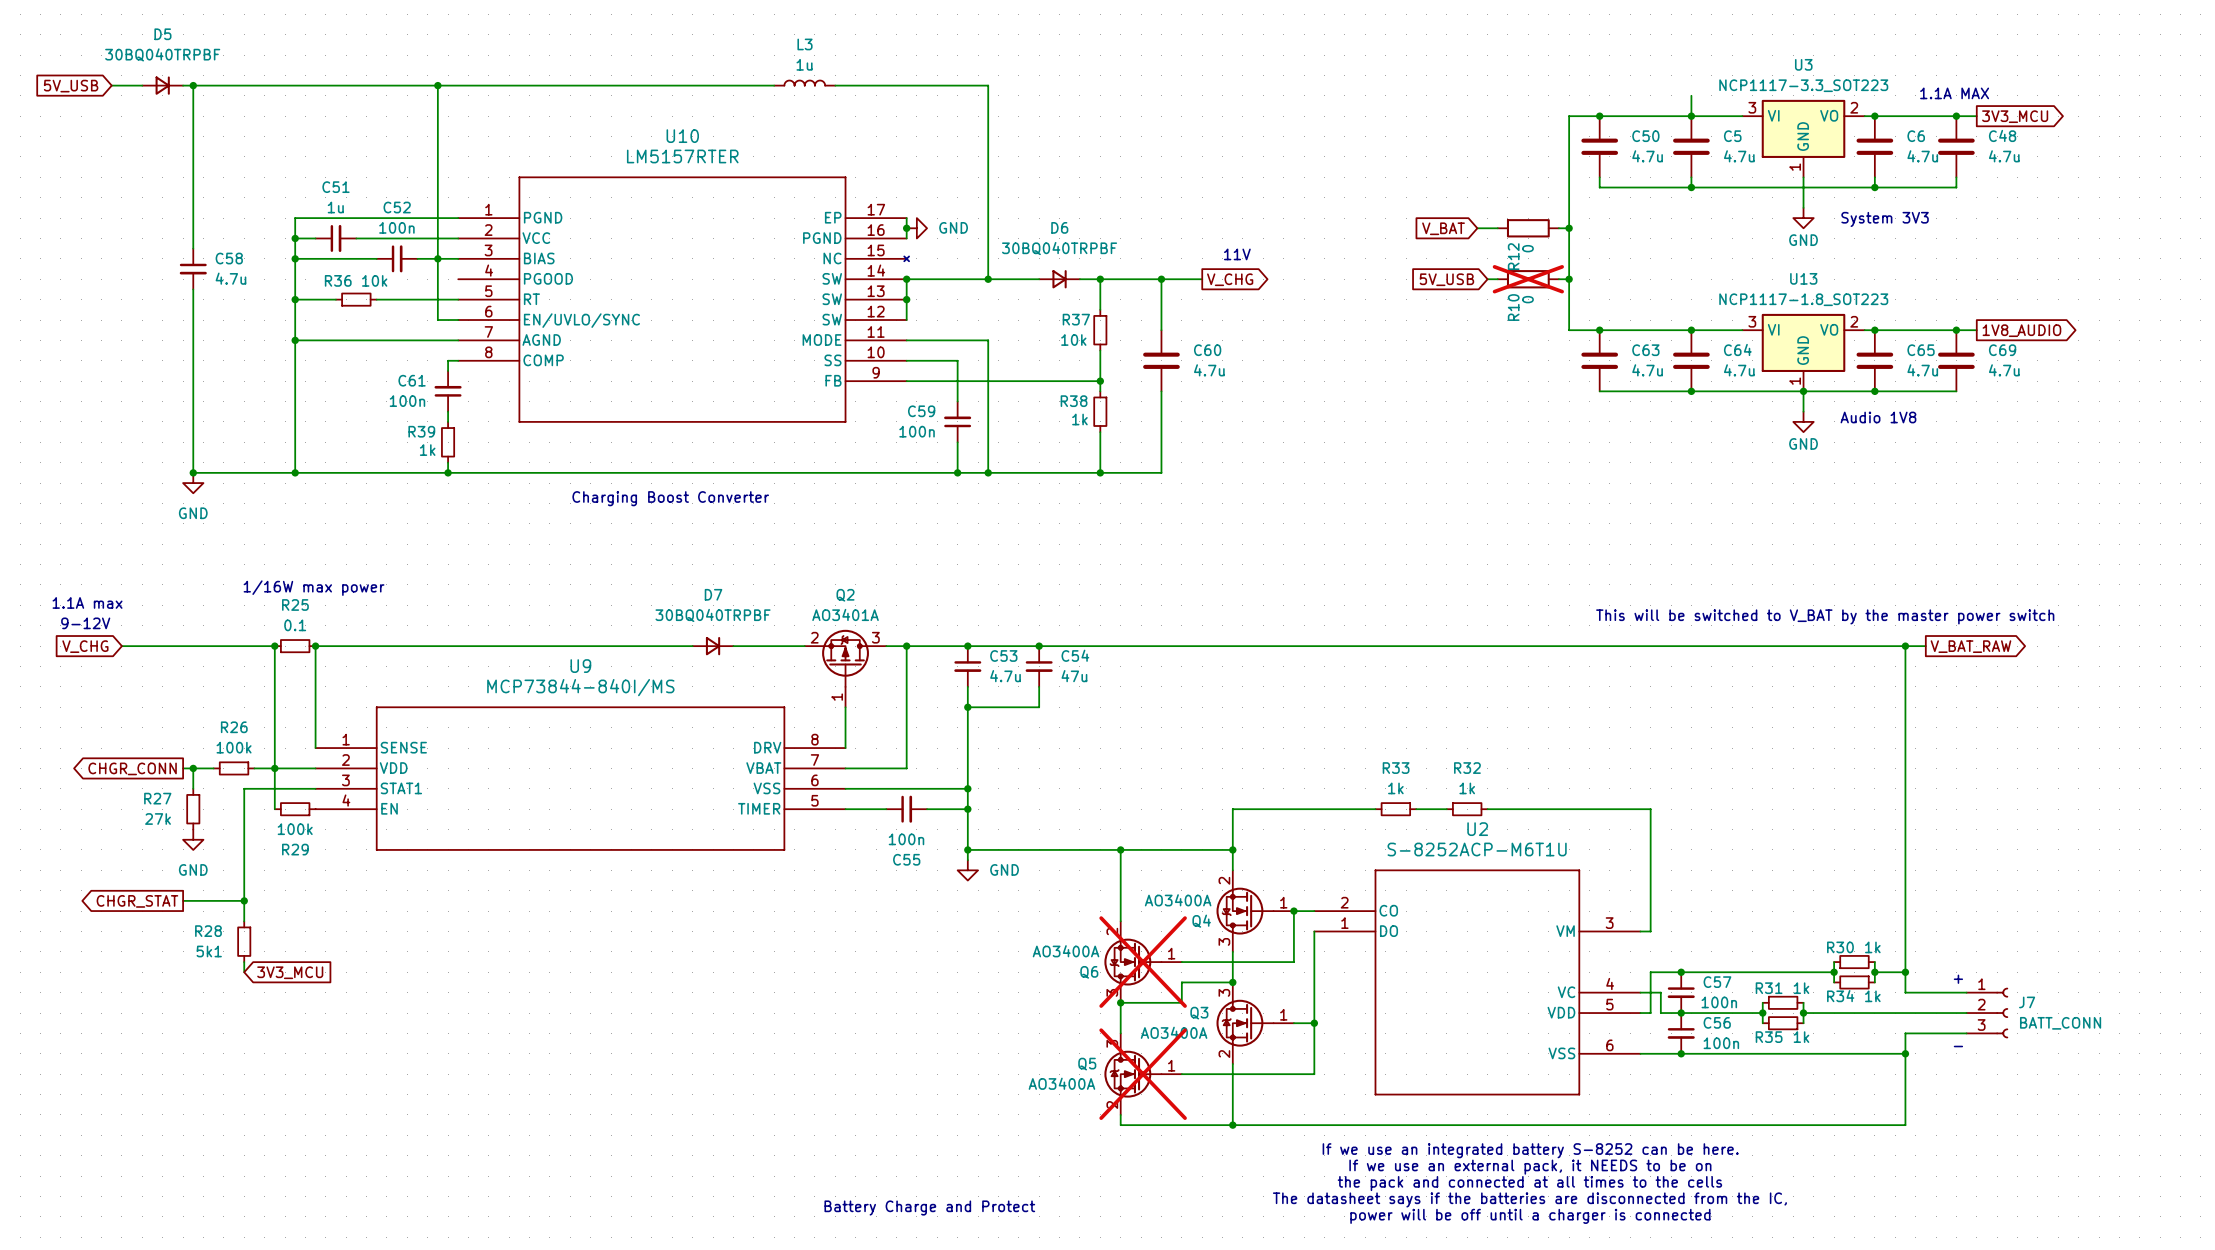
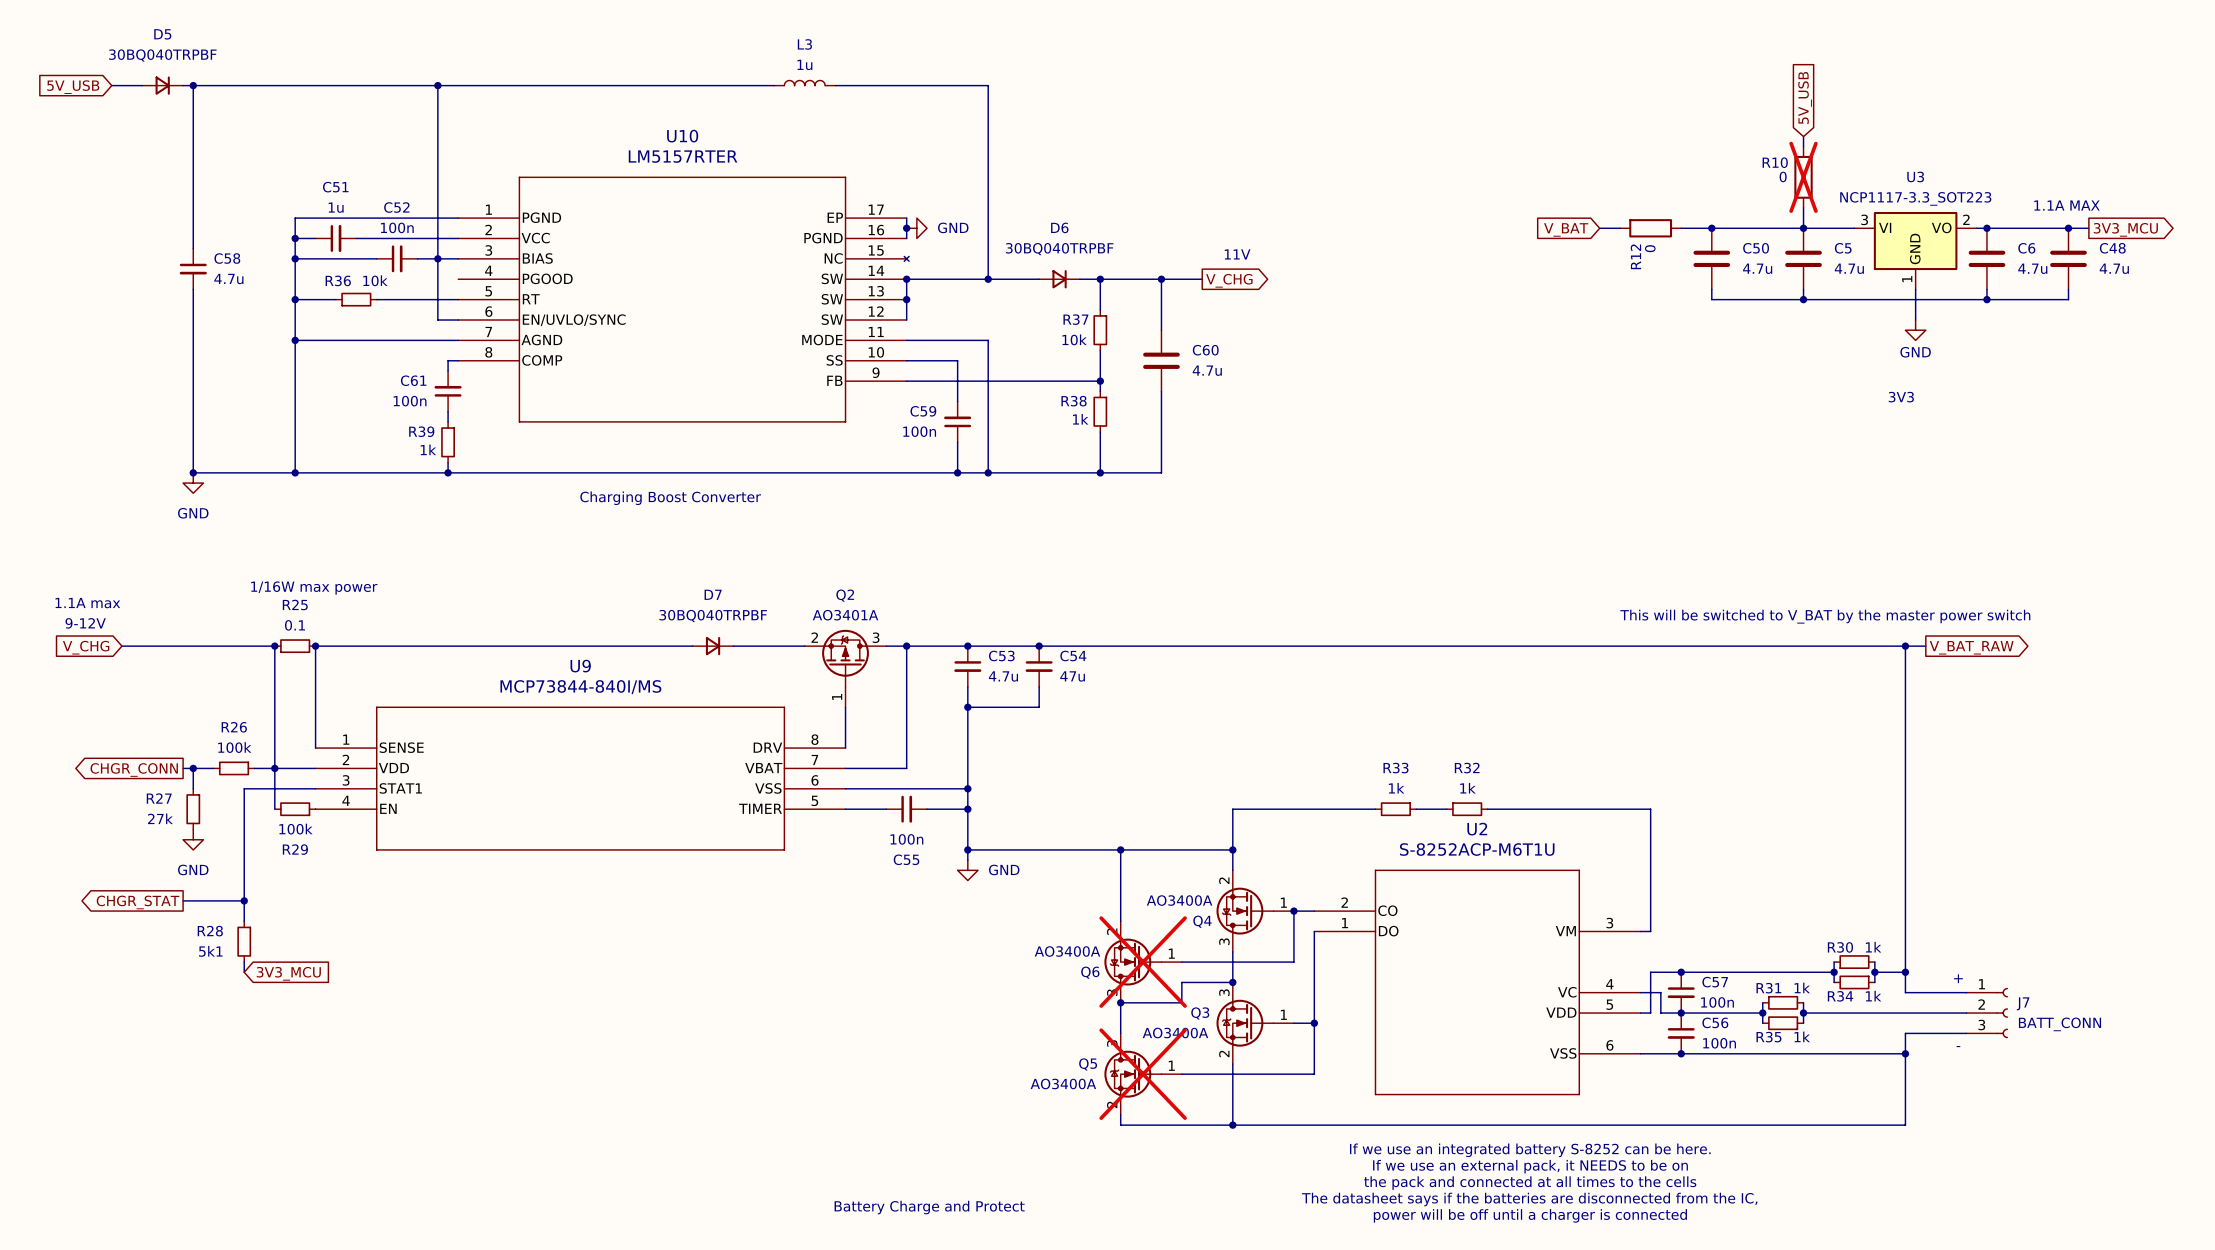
text position: 1.1A MAX (1954, 93) -> 1.1A MAX (2067, 205)
wire: (1691, 95) (1691, 116) -> none
global label: none -> 5V_USB (1805, 97)
junction: (1599, 116) -> none
junction: (1691, 116) -> none
wire: (1742, 116) (1569, 116) (1569, 330) (1742, 330) -> none
wire: (1864, 116) (1976, 116) -> (1976, 228) (2088, 228)
junction: (1874, 116) -> none
junction: (1956, 116) -> none
global label position: 3V3_MCU (2015, 116) -> 3V3_MCU (2125, 229)
U3 position: (1803, 138) -> (1915, 250)
C50 position: (1599, 146) -> (1711, 258)
C5 position: (1691, 146) -> (1803, 258)
C6 position: (1874, 146) -> (1986, 258)
C48 position: (1956, 146) -> (2068, 258)
wire: (1599, 177) (1599, 187) (1956, 187) (1956, 177) -> (1711, 289) (1711, 299) (2068, 299) (2068, 289)
wire: (1691, 177) (1691, 187) -> (1803, 289) (1803, 299)
wire: (1874, 177) (1874, 187) -> (1986, 289) (1986, 299)
junction position: (1691, 187) -> (1711, 228)
junction: (1874, 187) -> none
power symbol: GND (1803, 218) -> none
text: System 3V3 (1885, 219) -> none
global label position: V_BAT (1443, 228) -> V_BAT (1566, 229)
wire: (1477, 228) (1497, 228) -> (1599, 228) (1620, 228)
R12 position: (1528, 228) -> (1650, 228)
junction: (1569, 228) -> none
wire: none -> (1681, 228) (1854, 228)
junction: none -> (1803, 228)
junction: none -> (1986, 228)
junction: none -> (2068, 228)
global label: 5V_USB (1446, 279) -> none
wire: (1487, 279) (1497, 279) -> none
R10 rotation: 0° (1528, 279) -> 90° clockwise (1803, 177)
R10 position: (1528, 279) -> (1803, 177)
wire: (1558, 279) (1569, 279) -> none
junction: (1569, 279) -> none
wire: none -> (1915, 289) (1915, 320)
junction: none -> (1803, 299)
junction: (1599, 330) -> none
junction: (1691, 330) -> none
wire: (1864, 330) (1976, 330) -> none
junction: (1874, 330) -> none
power symbol: none -> GND (1915, 330)
junction position: (1956, 330) -> (1986, 299)
global label: 1V8_AUDIO (2021, 330) -> none
U13: NCP1117-1.8_SOT223 (1803, 352) -> none
C63: 4.7u (1599, 360) -> none
C64: 4.7u (1691, 360) -> none
C65: 4.7u (1874, 360) -> none
C69: 4.7u (1956, 360) -> none
wire: (1599, 391) (1956, 391) -> none
junction: (1691, 391) -> none
wire: (1803, 391) (1803, 411) -> none
junction: (1803, 391) -> none
junction: (1874, 391) -> none
text: none -> 3V3 (1901, 397)
text: Audio 1V8 (1878, 417) -> none
power symbol: GND (1803, 421) -> none

